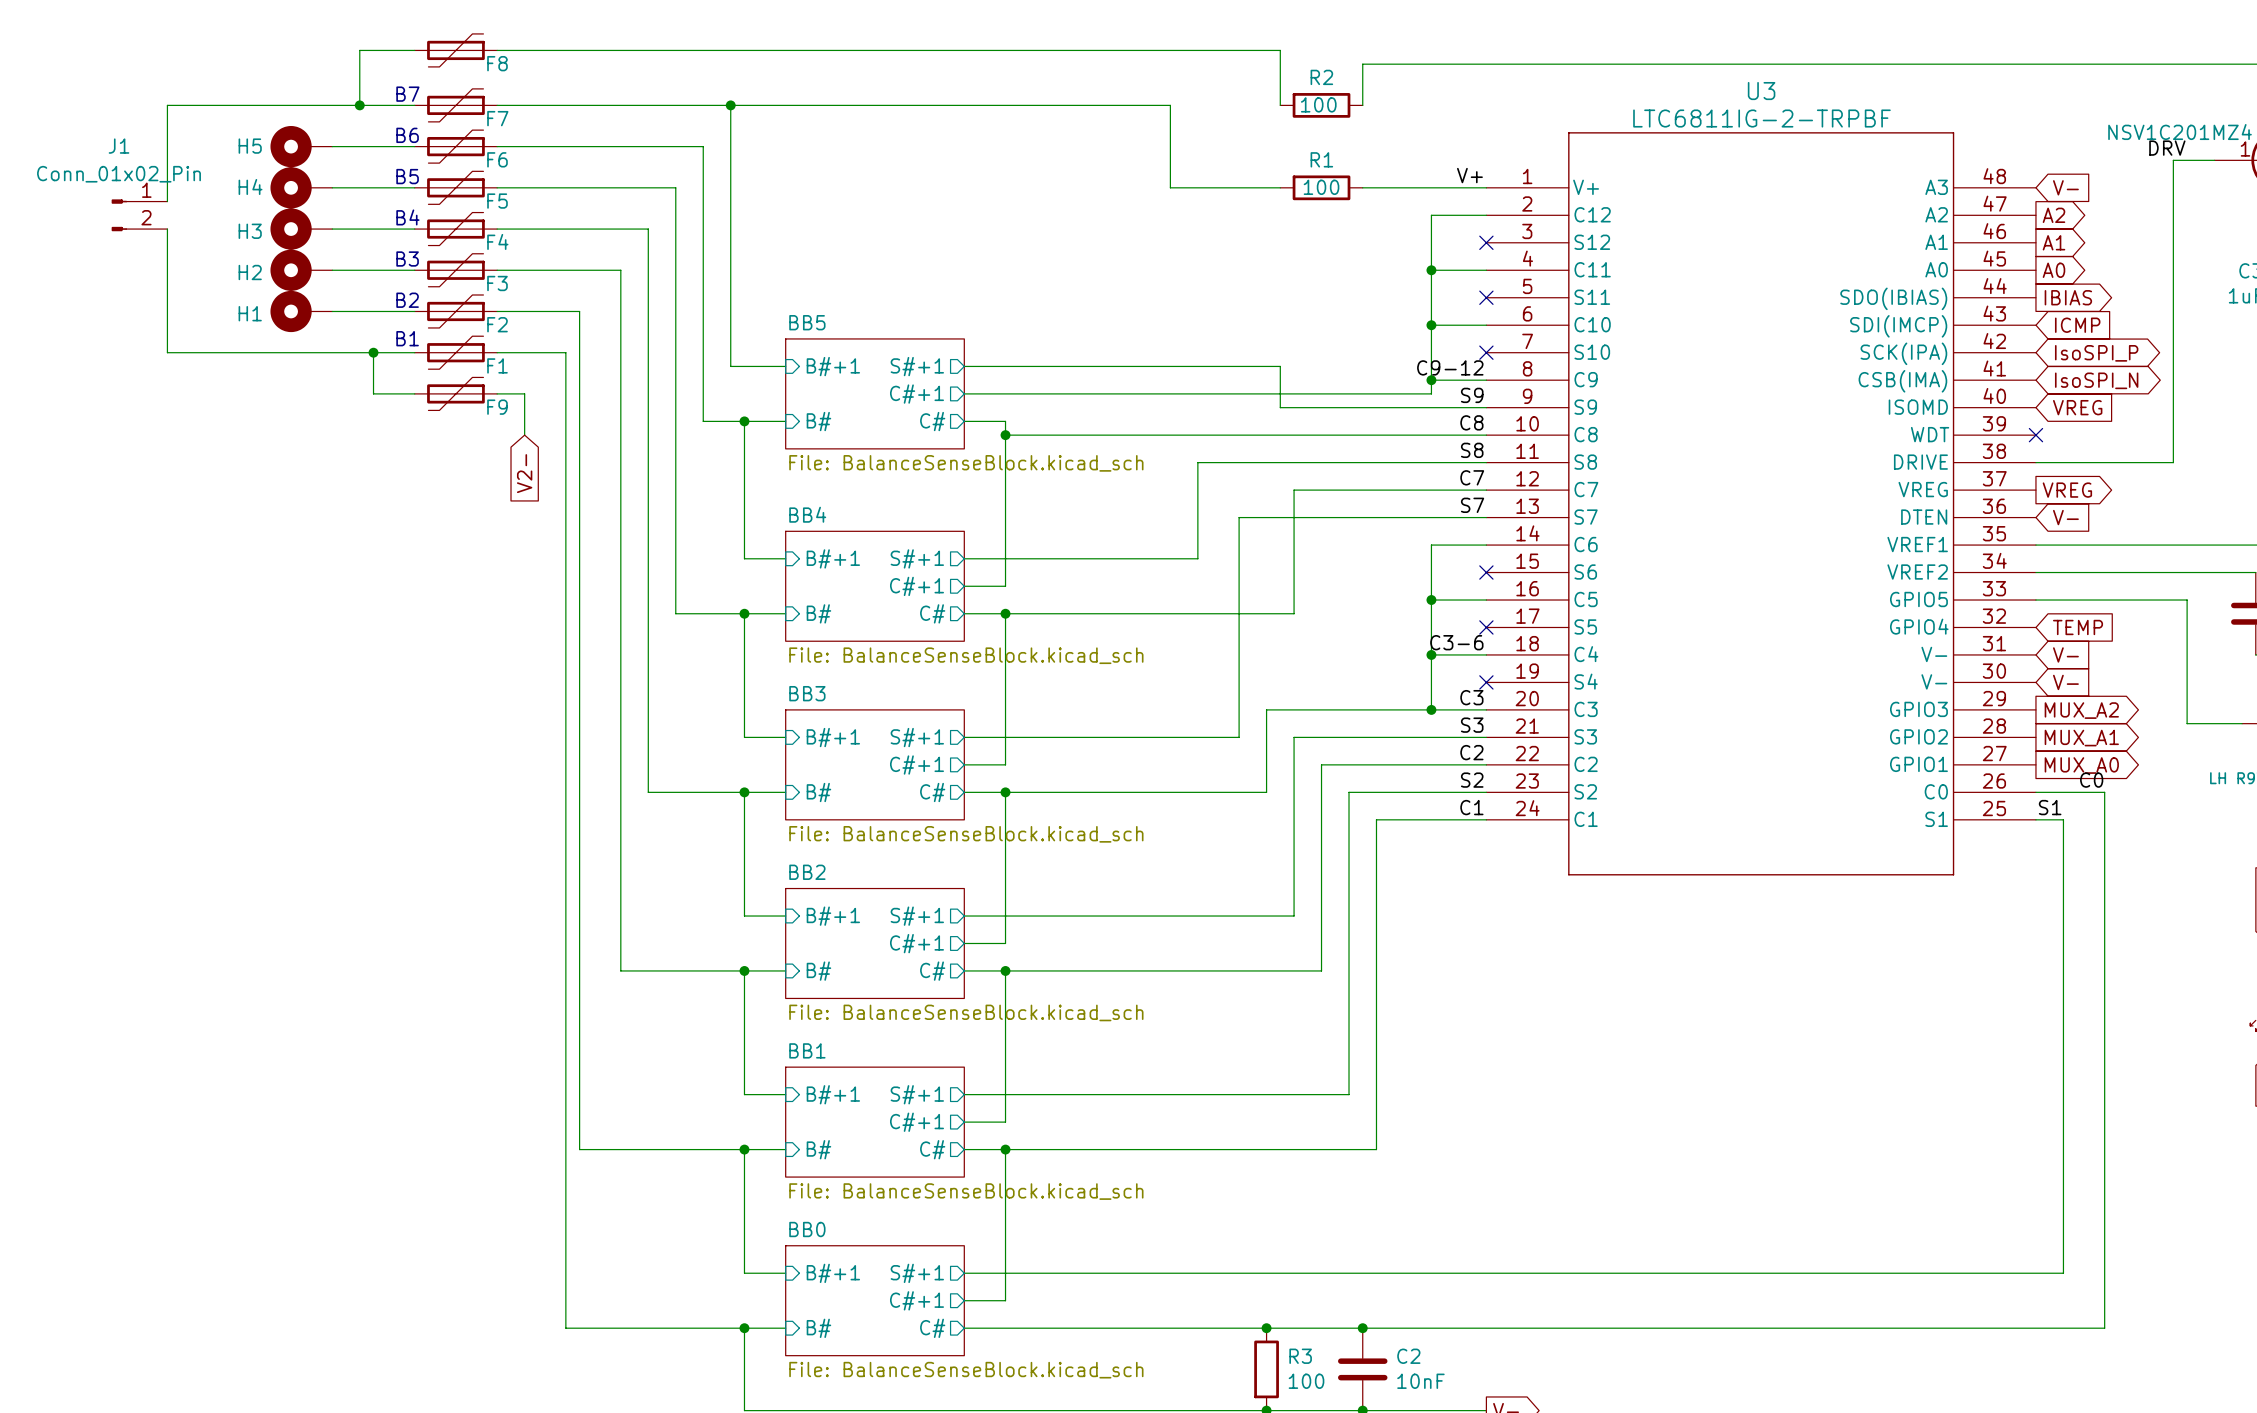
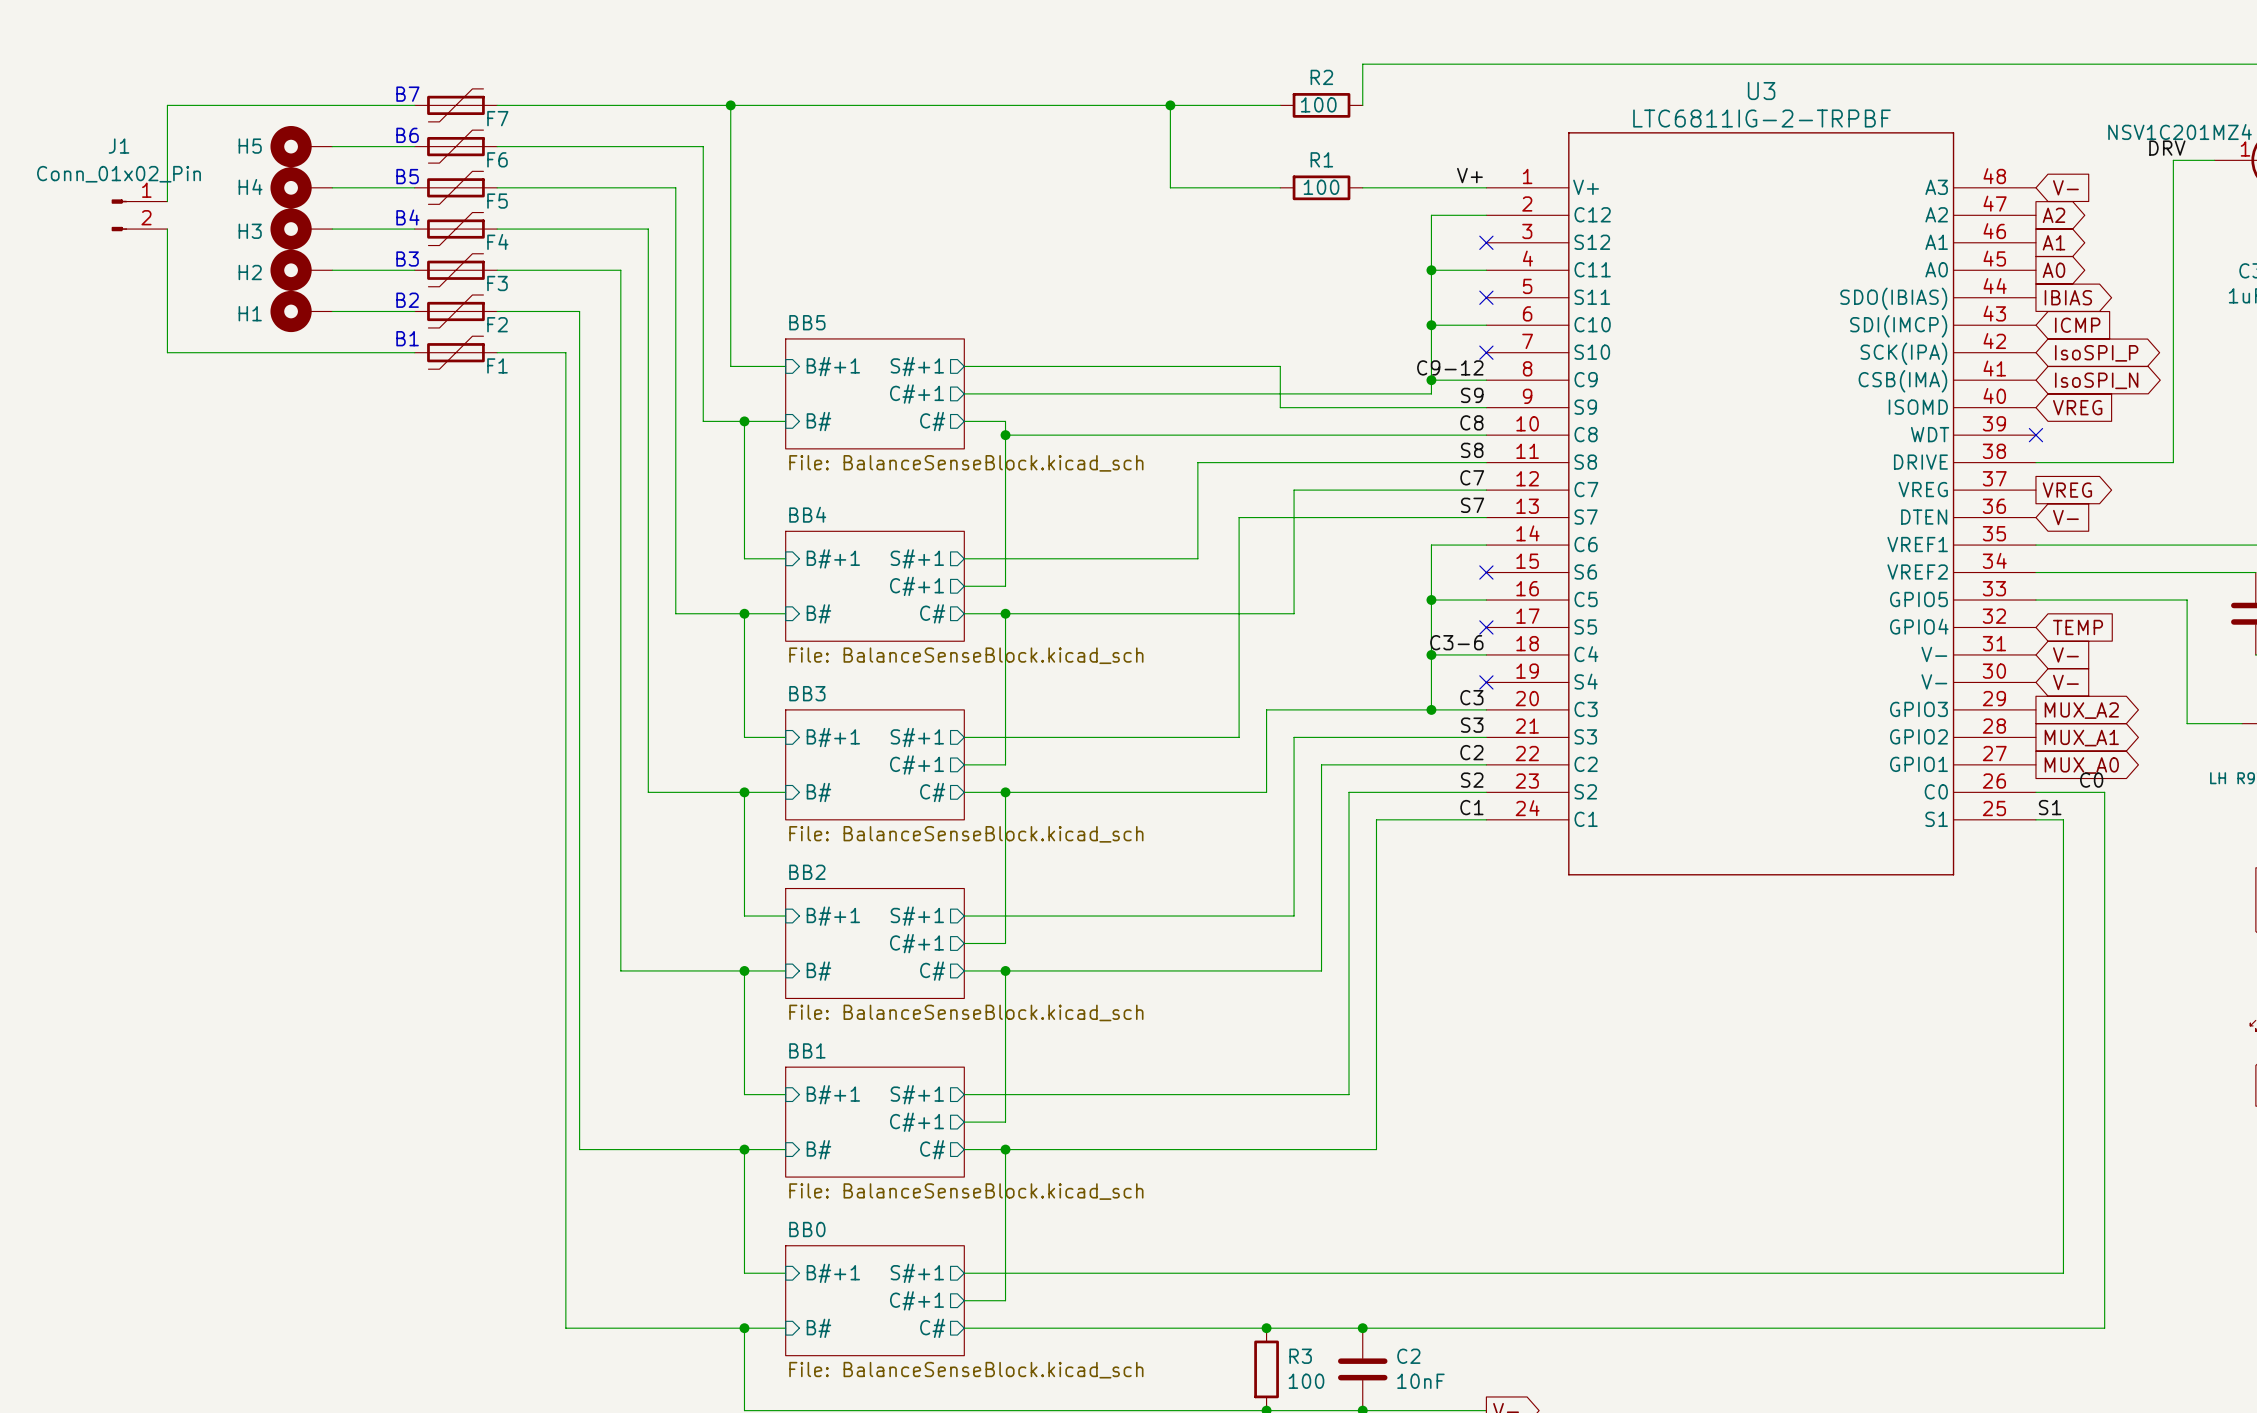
wire: (414, 50) (359, 50) (359, 105) -> none
F8: (455, 50) -> none
wire: (497, 50) (1280, 50) (1280, 105) -> (1170, 105) (1280, 105)
junction: (359, 105) -> none
junction: none -> (1170, 105)
wire: (373, 352) (373, 393) (414, 393) -> none
junction: (373, 352) -> none
F9: (455, 393) -> none
wire: (497, 393) (524, 393) (524, 435) -> none
global label: V2- (524, 473) -> none

